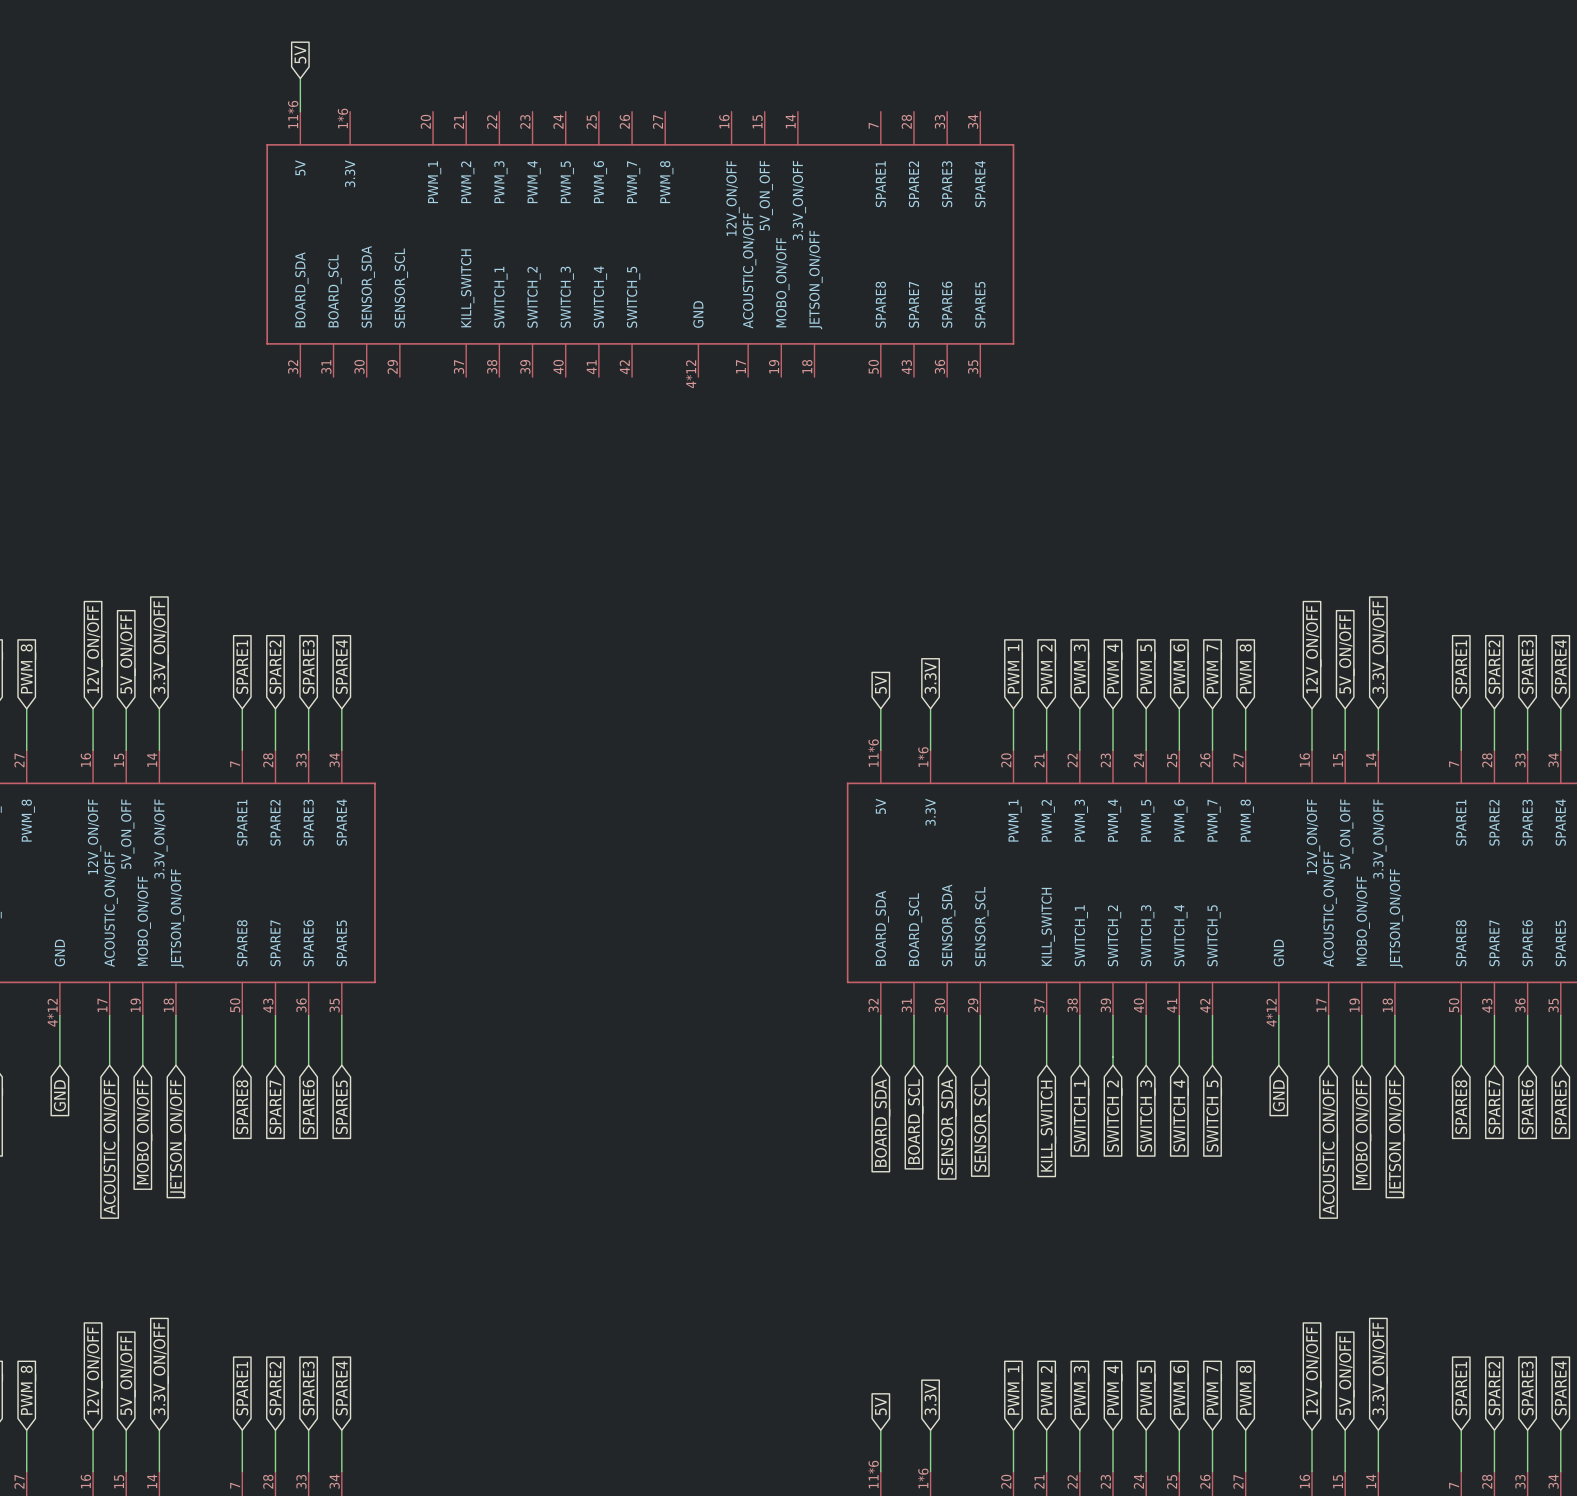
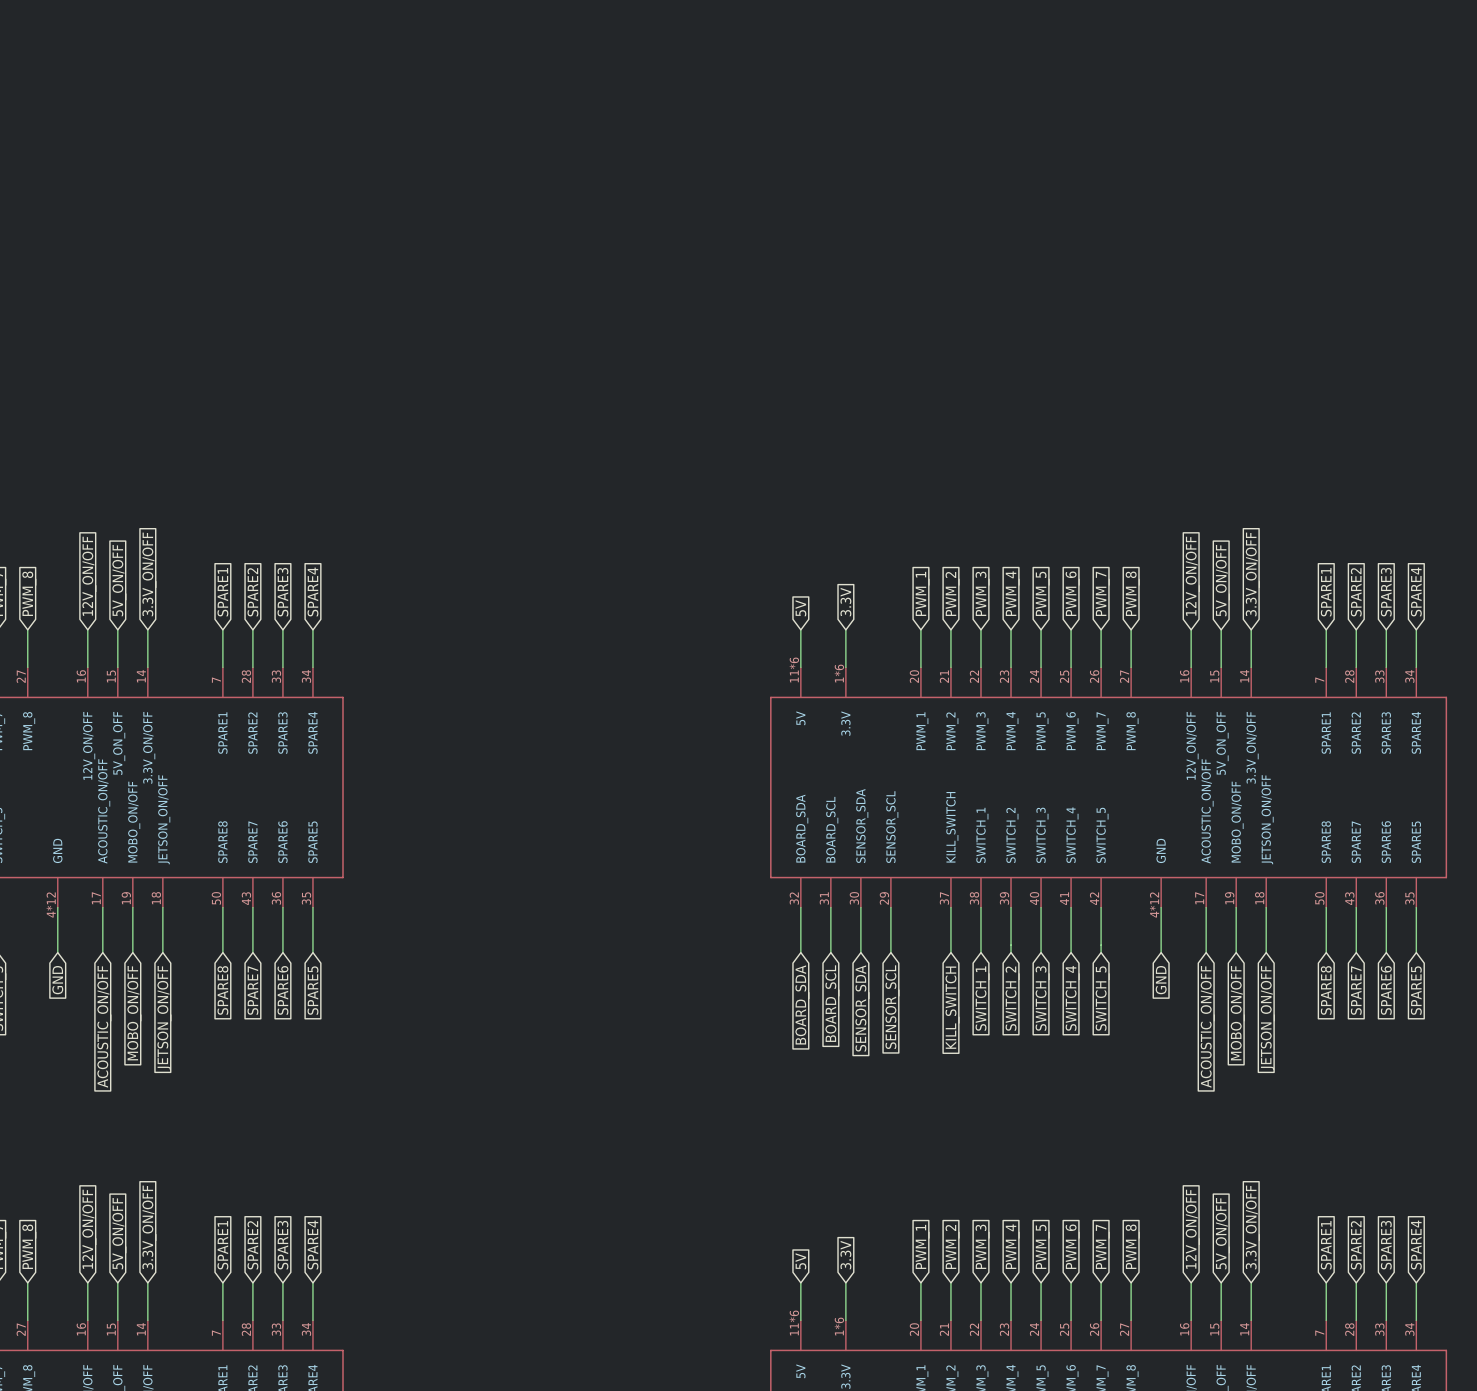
global label: 5V (300, 54) -> none
wire: (300, 78) (300, 111) -> none
part: (640, 244) -> none

